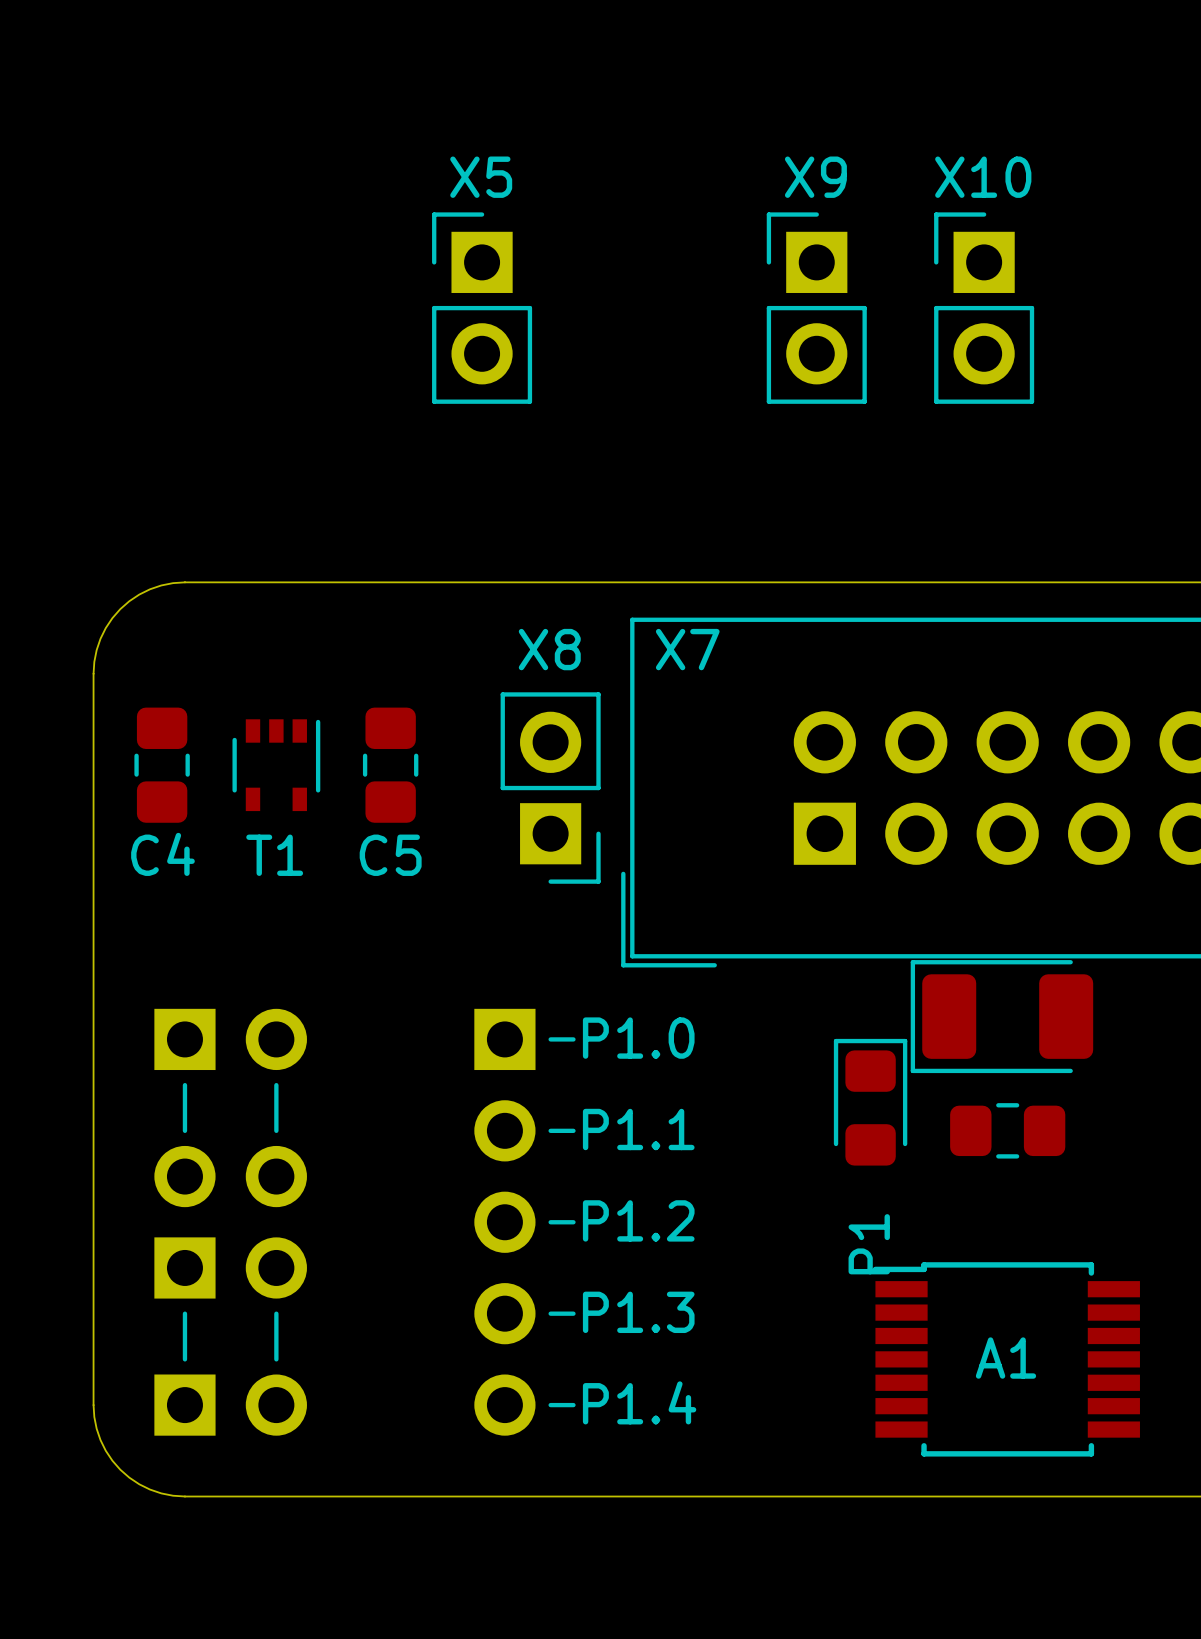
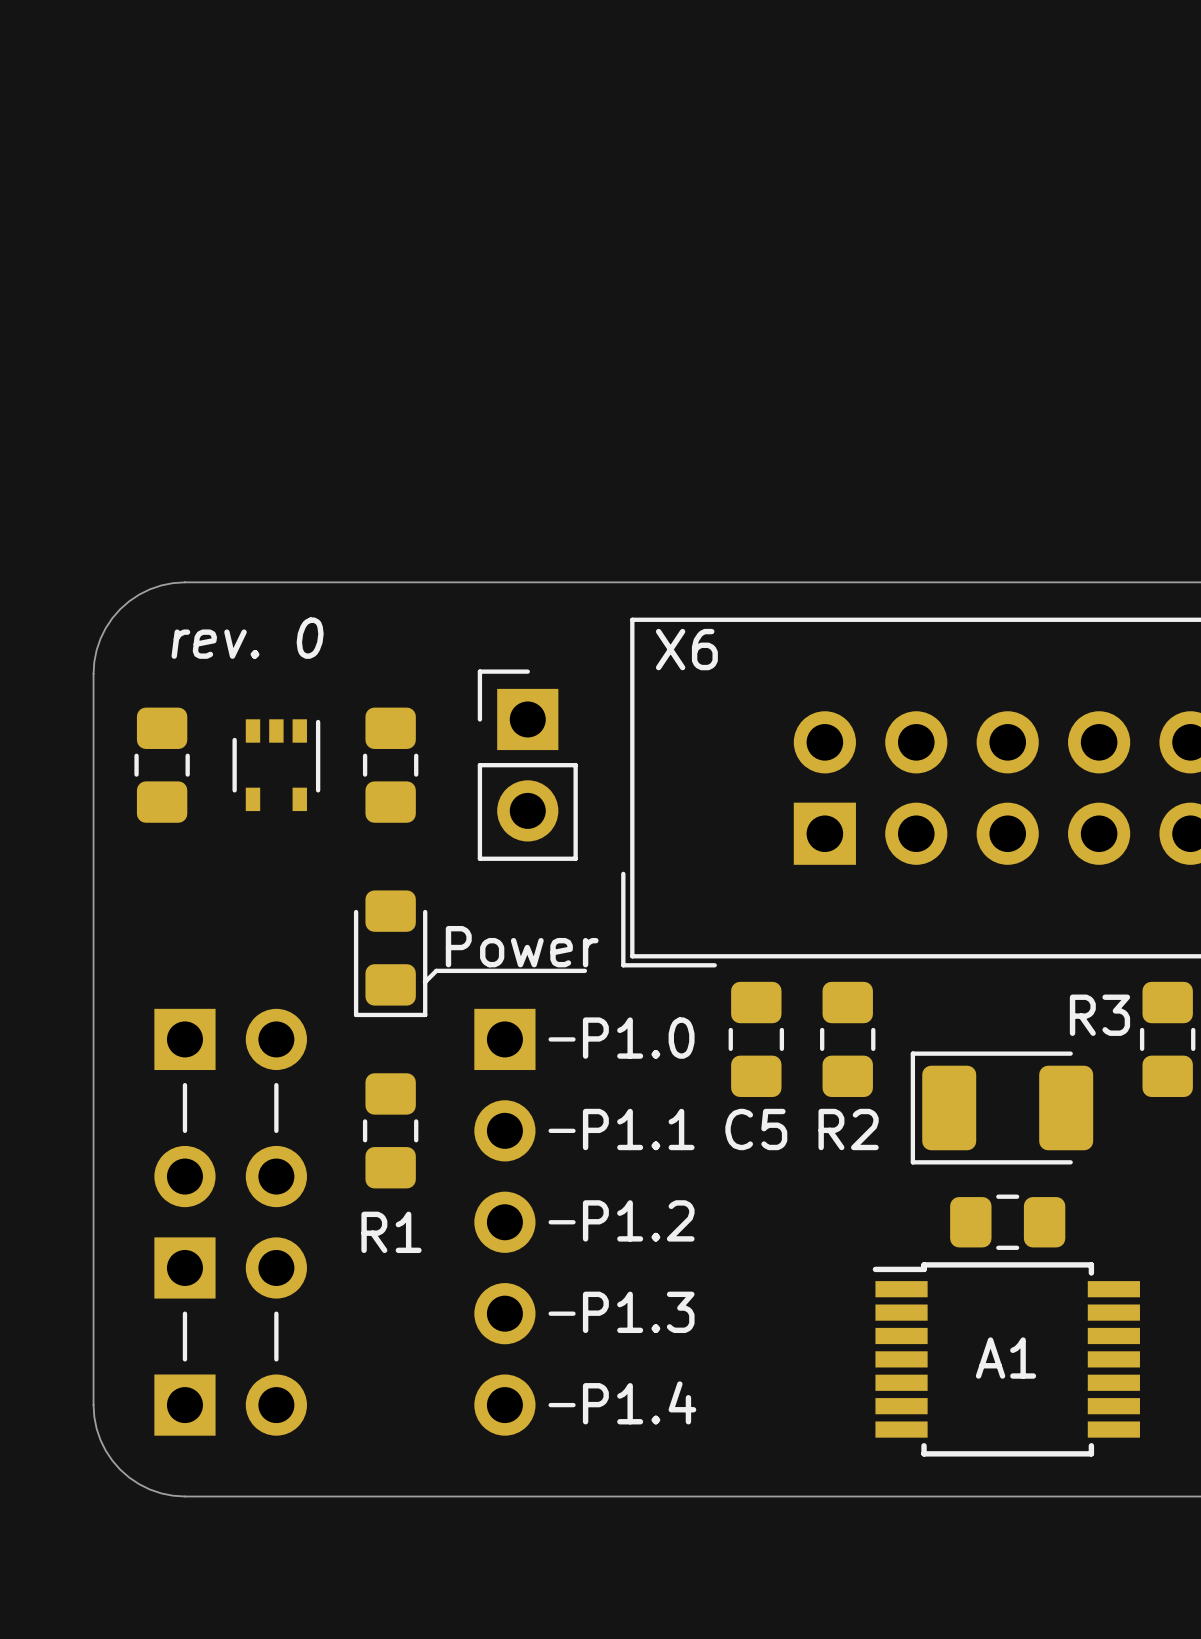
X5: (482, 308) -> none
X9: (816, 308) -> none
X10: (984, 308) -> none
text: none -> rev. 0 (247, 638)
X7 name: X7 (687, 649) -> X6 (686, 649)
part: none -> (527, 765)
X8: (550, 788) -> none
C4 name: C4 (162, 854) -> none
T1 name: T1 (274, 855) -> none
C5 name: C5 (390, 855) -> none
part: none -> Power (390, 953)
line: none -> (584, 970) (436, 970) (424, 982)
part: (1001, 1016) -> none
C5: none -> (756, 1039)
R2: none -> (847, 1039)
R3: none -> (1167, 1039)
P1: (870, 1102) -> none
part footprint: [950, 1103, 1066, 1159] -> [910, 1051, 1094, 1165]
R1: none -> (390, 1130)
part: none -> (1007, 1222)

